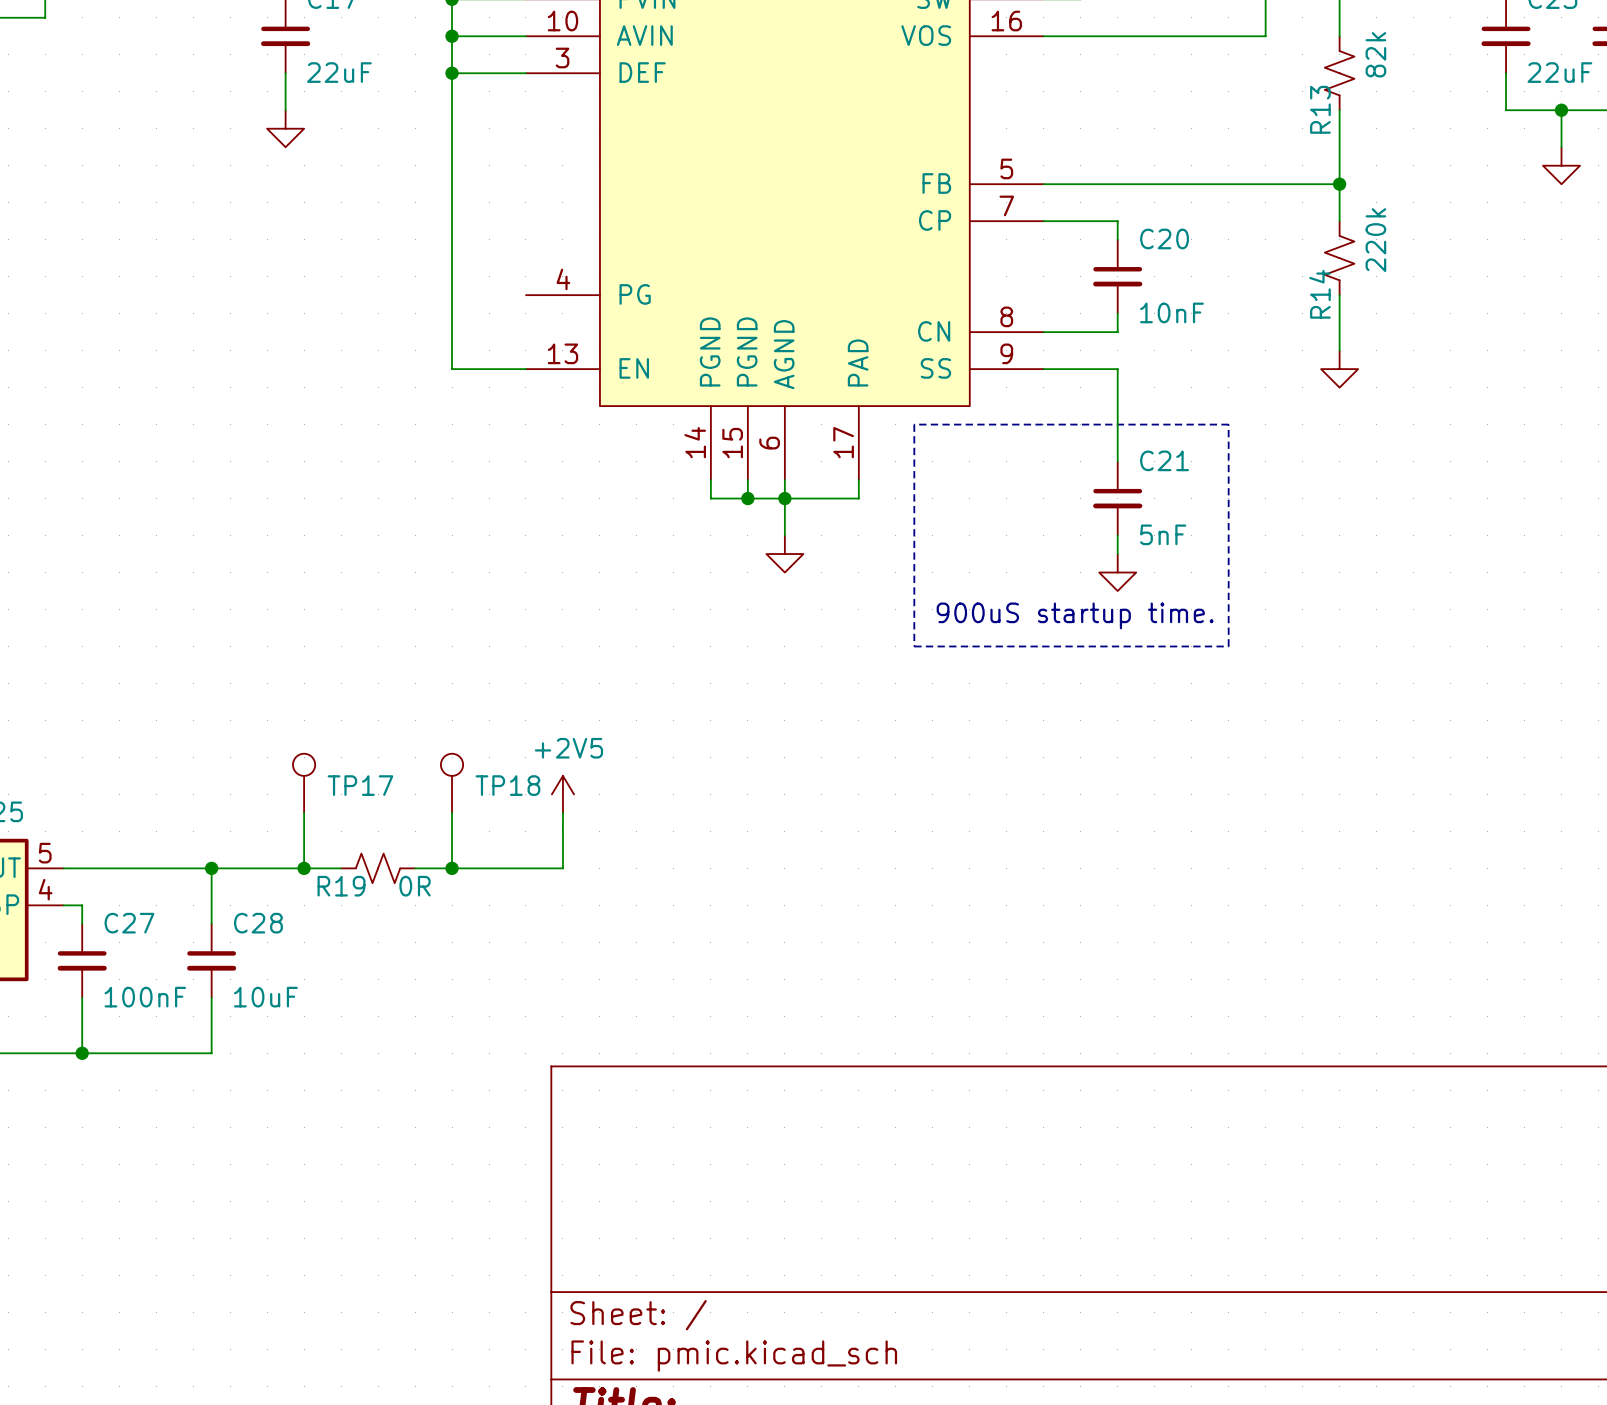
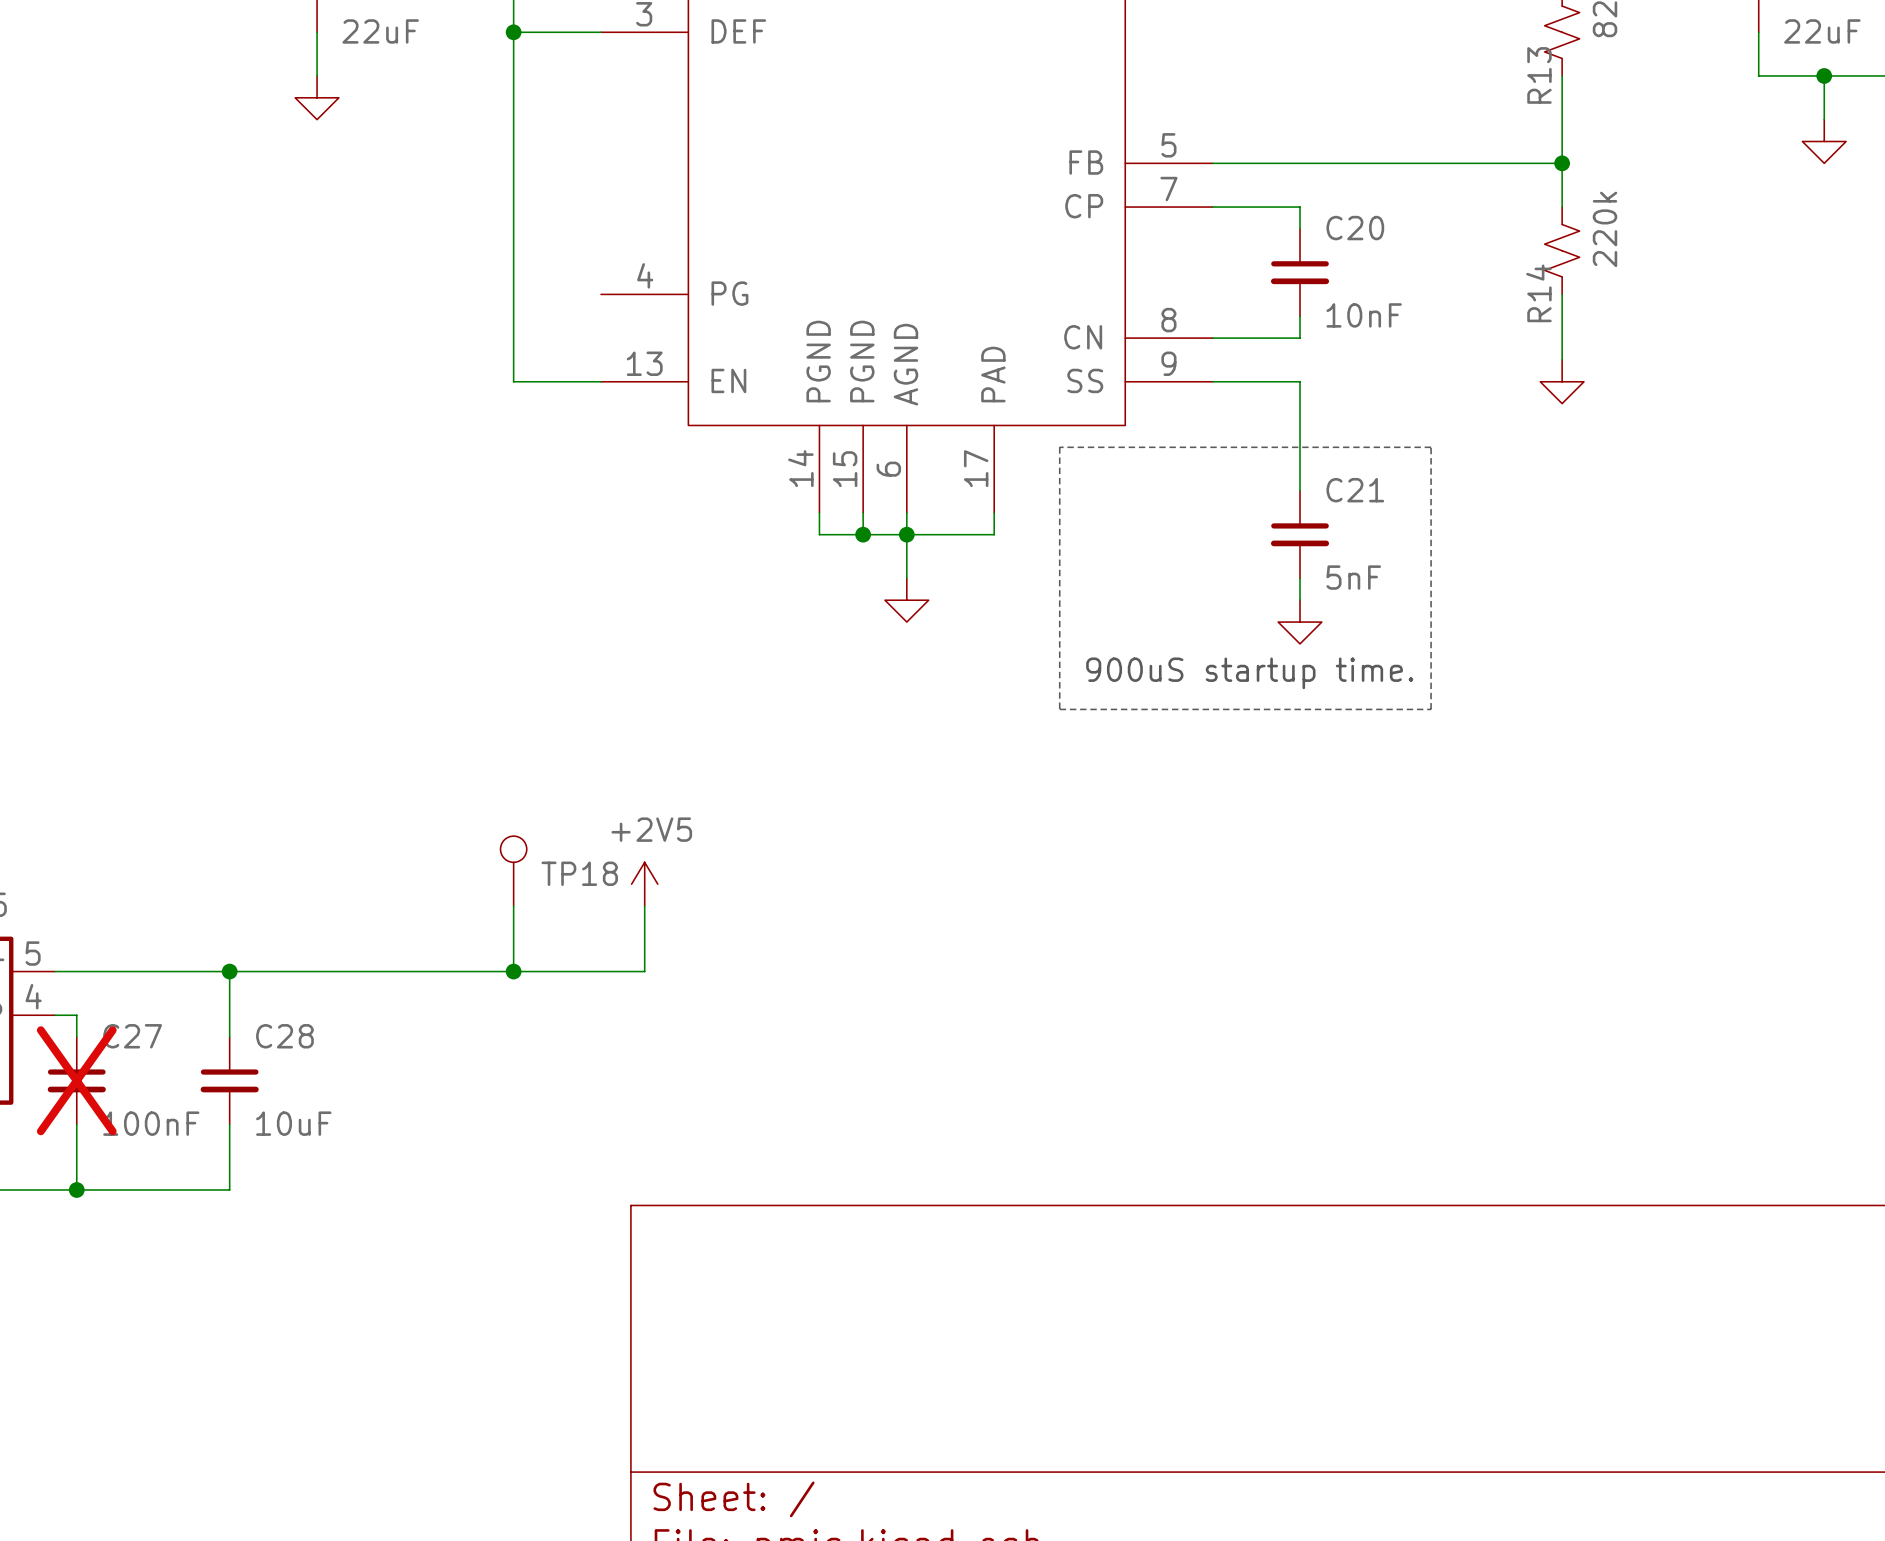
TP17: (304, 783) -> none
wire: (304, 812) (304, 868) -> none
junction: (304, 868) -> none
wire: none -> (382, 971) (469, 971)
R19: 0R (378, 868) -> none
C27 do-not-place cross: none -> (76, 1080)

